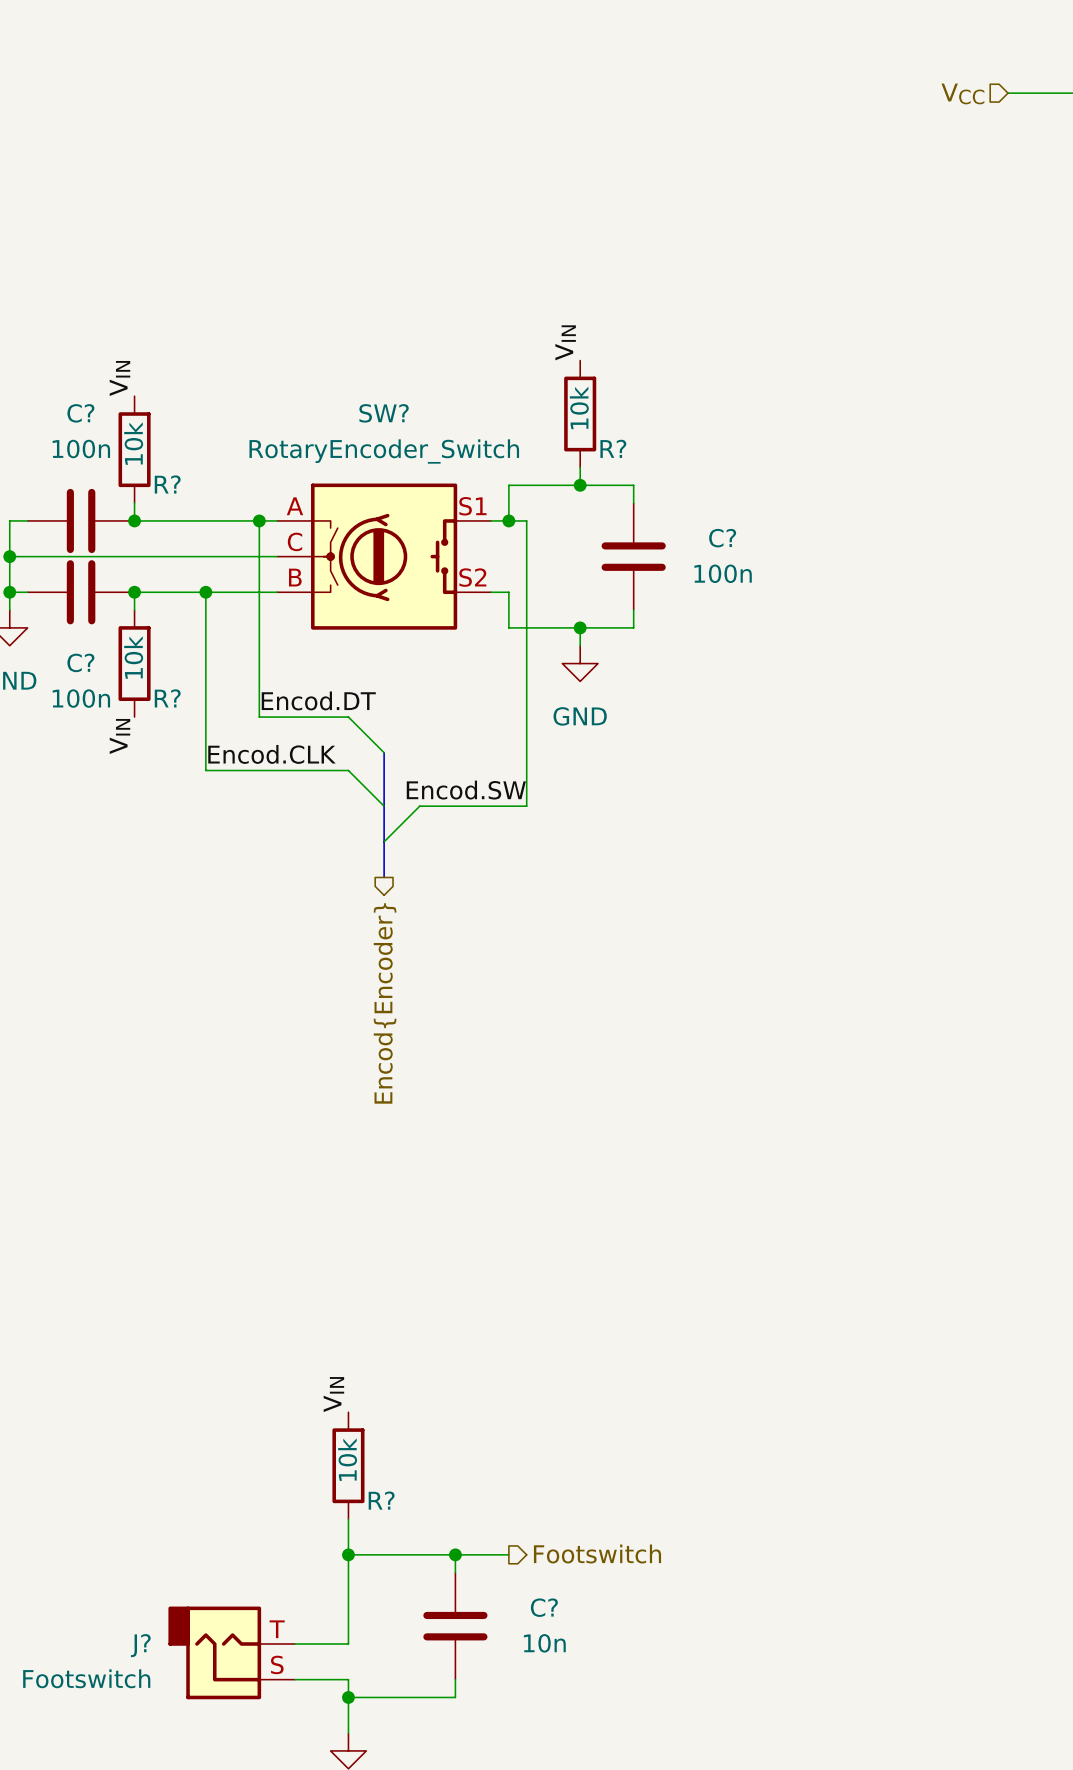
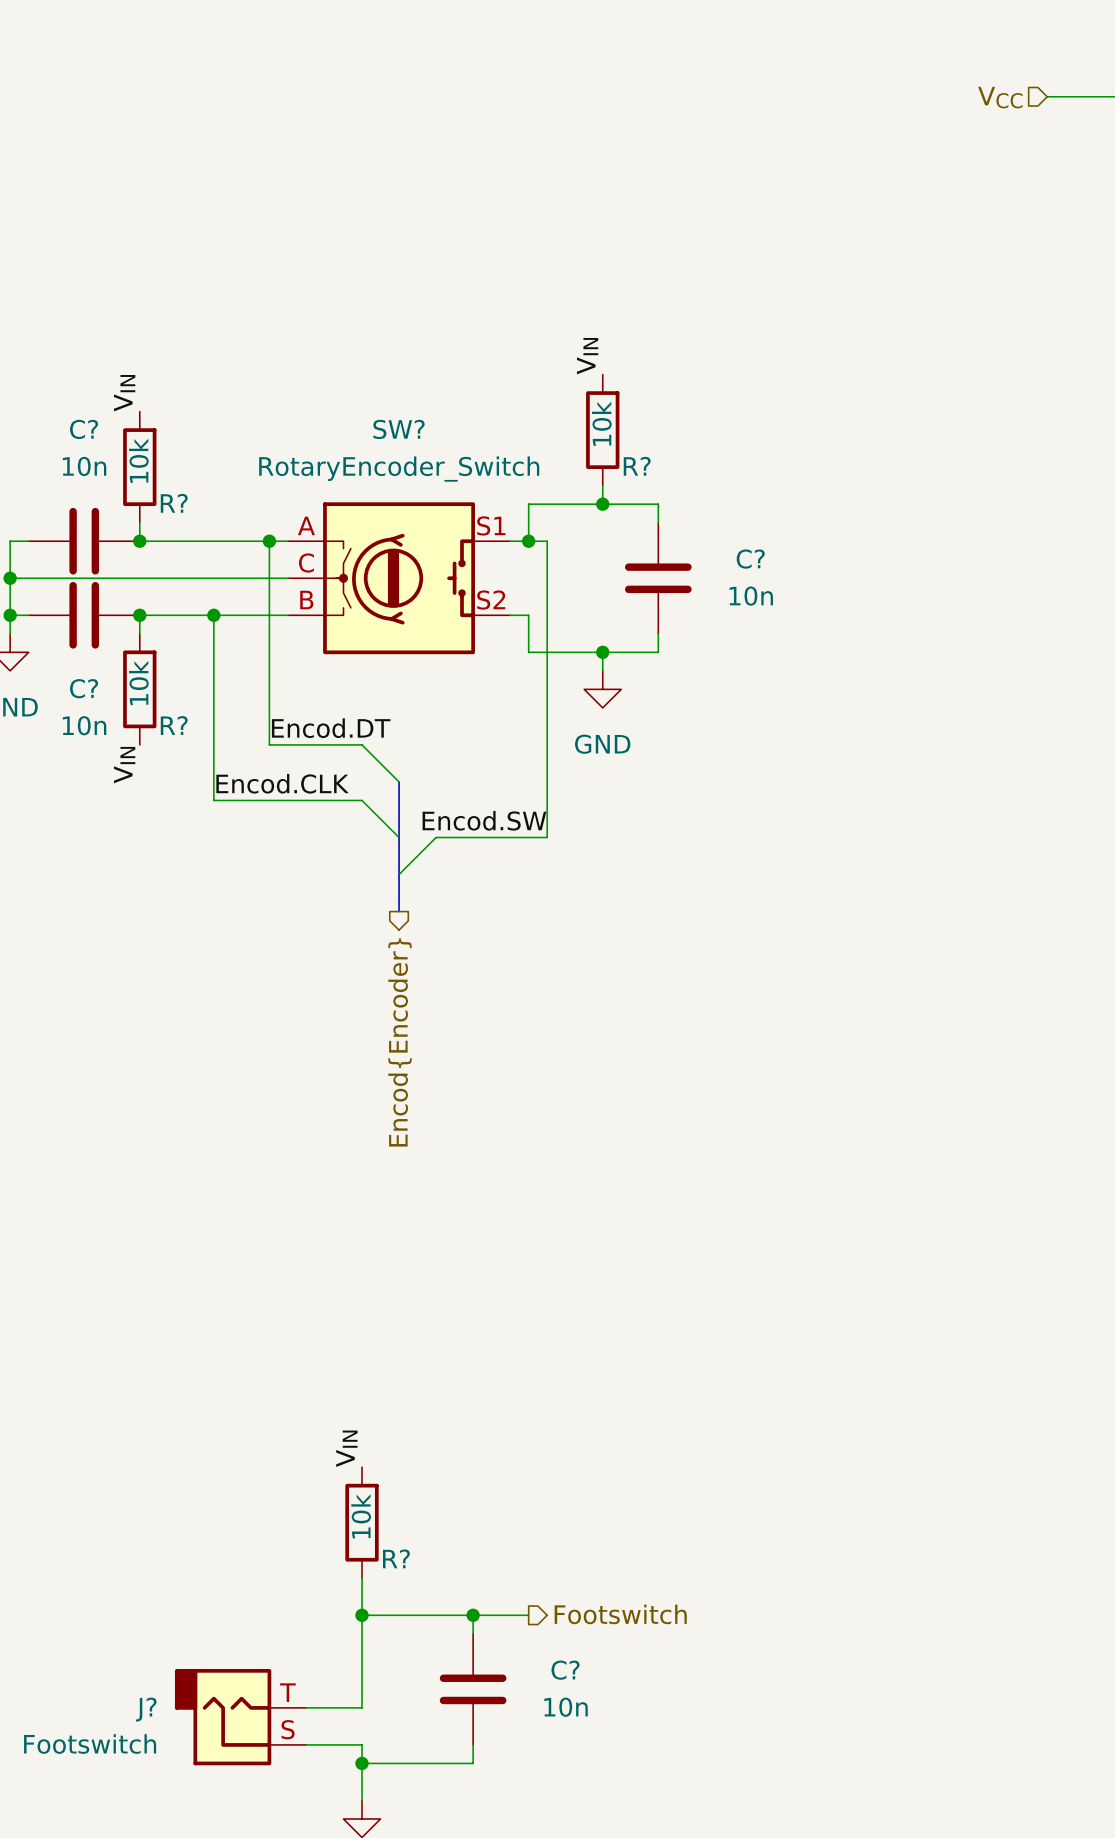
C? value: 100n (81, 449) -> 10n (84, 466)
C? value: 100n (723, 573) -> 10n (751, 596)
C? value: 100n (81, 698) -> 10n (84, 725)

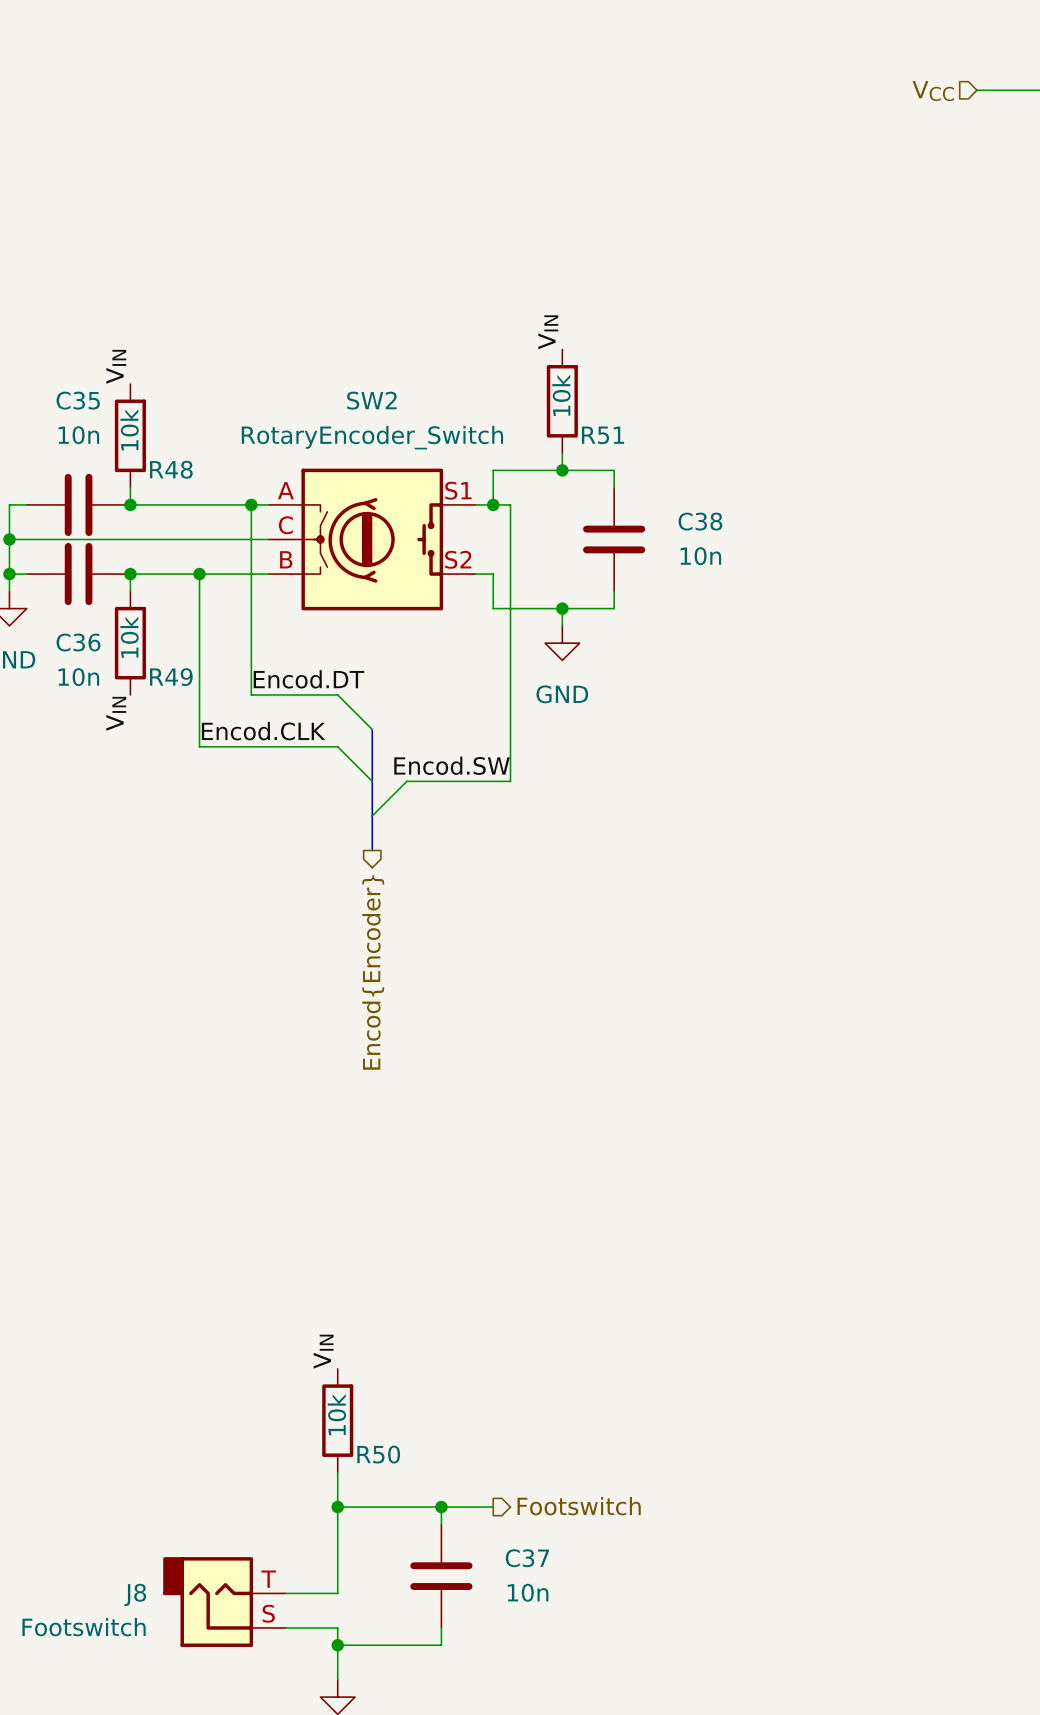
C? name: C? (84, 429) -> C35 (78, 400)
SW? name: SW? (398, 429) -> SW2 (371, 400)
R? name: R? (637, 466) -> R51 (603, 435)
R? name: R? (174, 503) -> R48 (171, 469)
C? name: C? (750, 559) -> C38 (700, 521)
C? name: C? (84, 688) -> C36 (78, 642)
R? name: R? (174, 725) -> R49 (171, 677)
R? name: R? (396, 1558) -> R50 (378, 1454)
C? name: C? (565, 1670) -> C37 (527, 1558)
J? name: J? (146, 1709) -> J8 (135, 1594)

